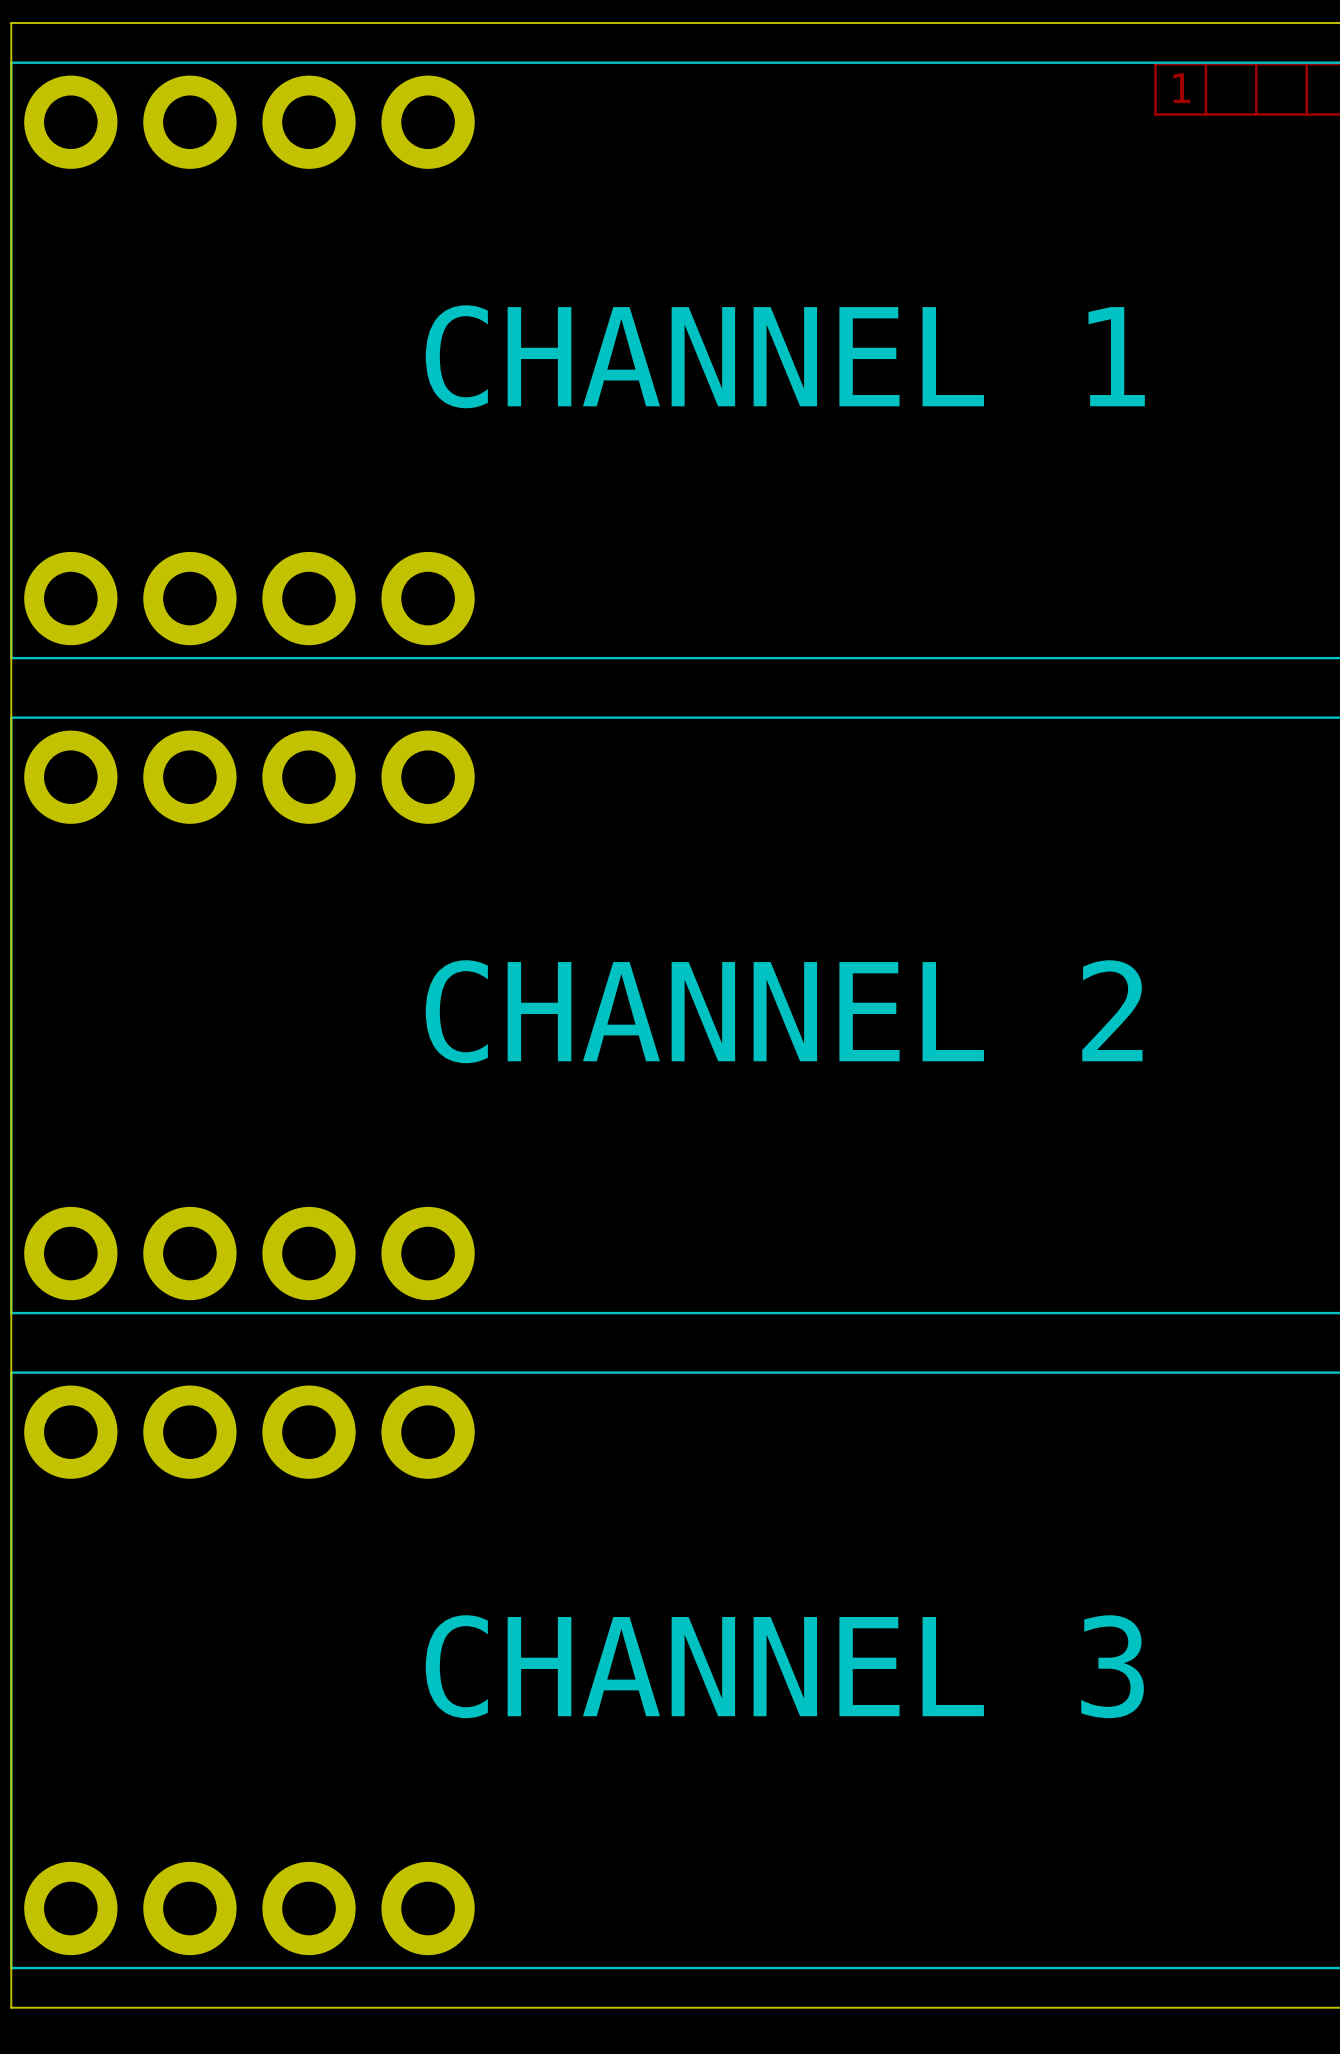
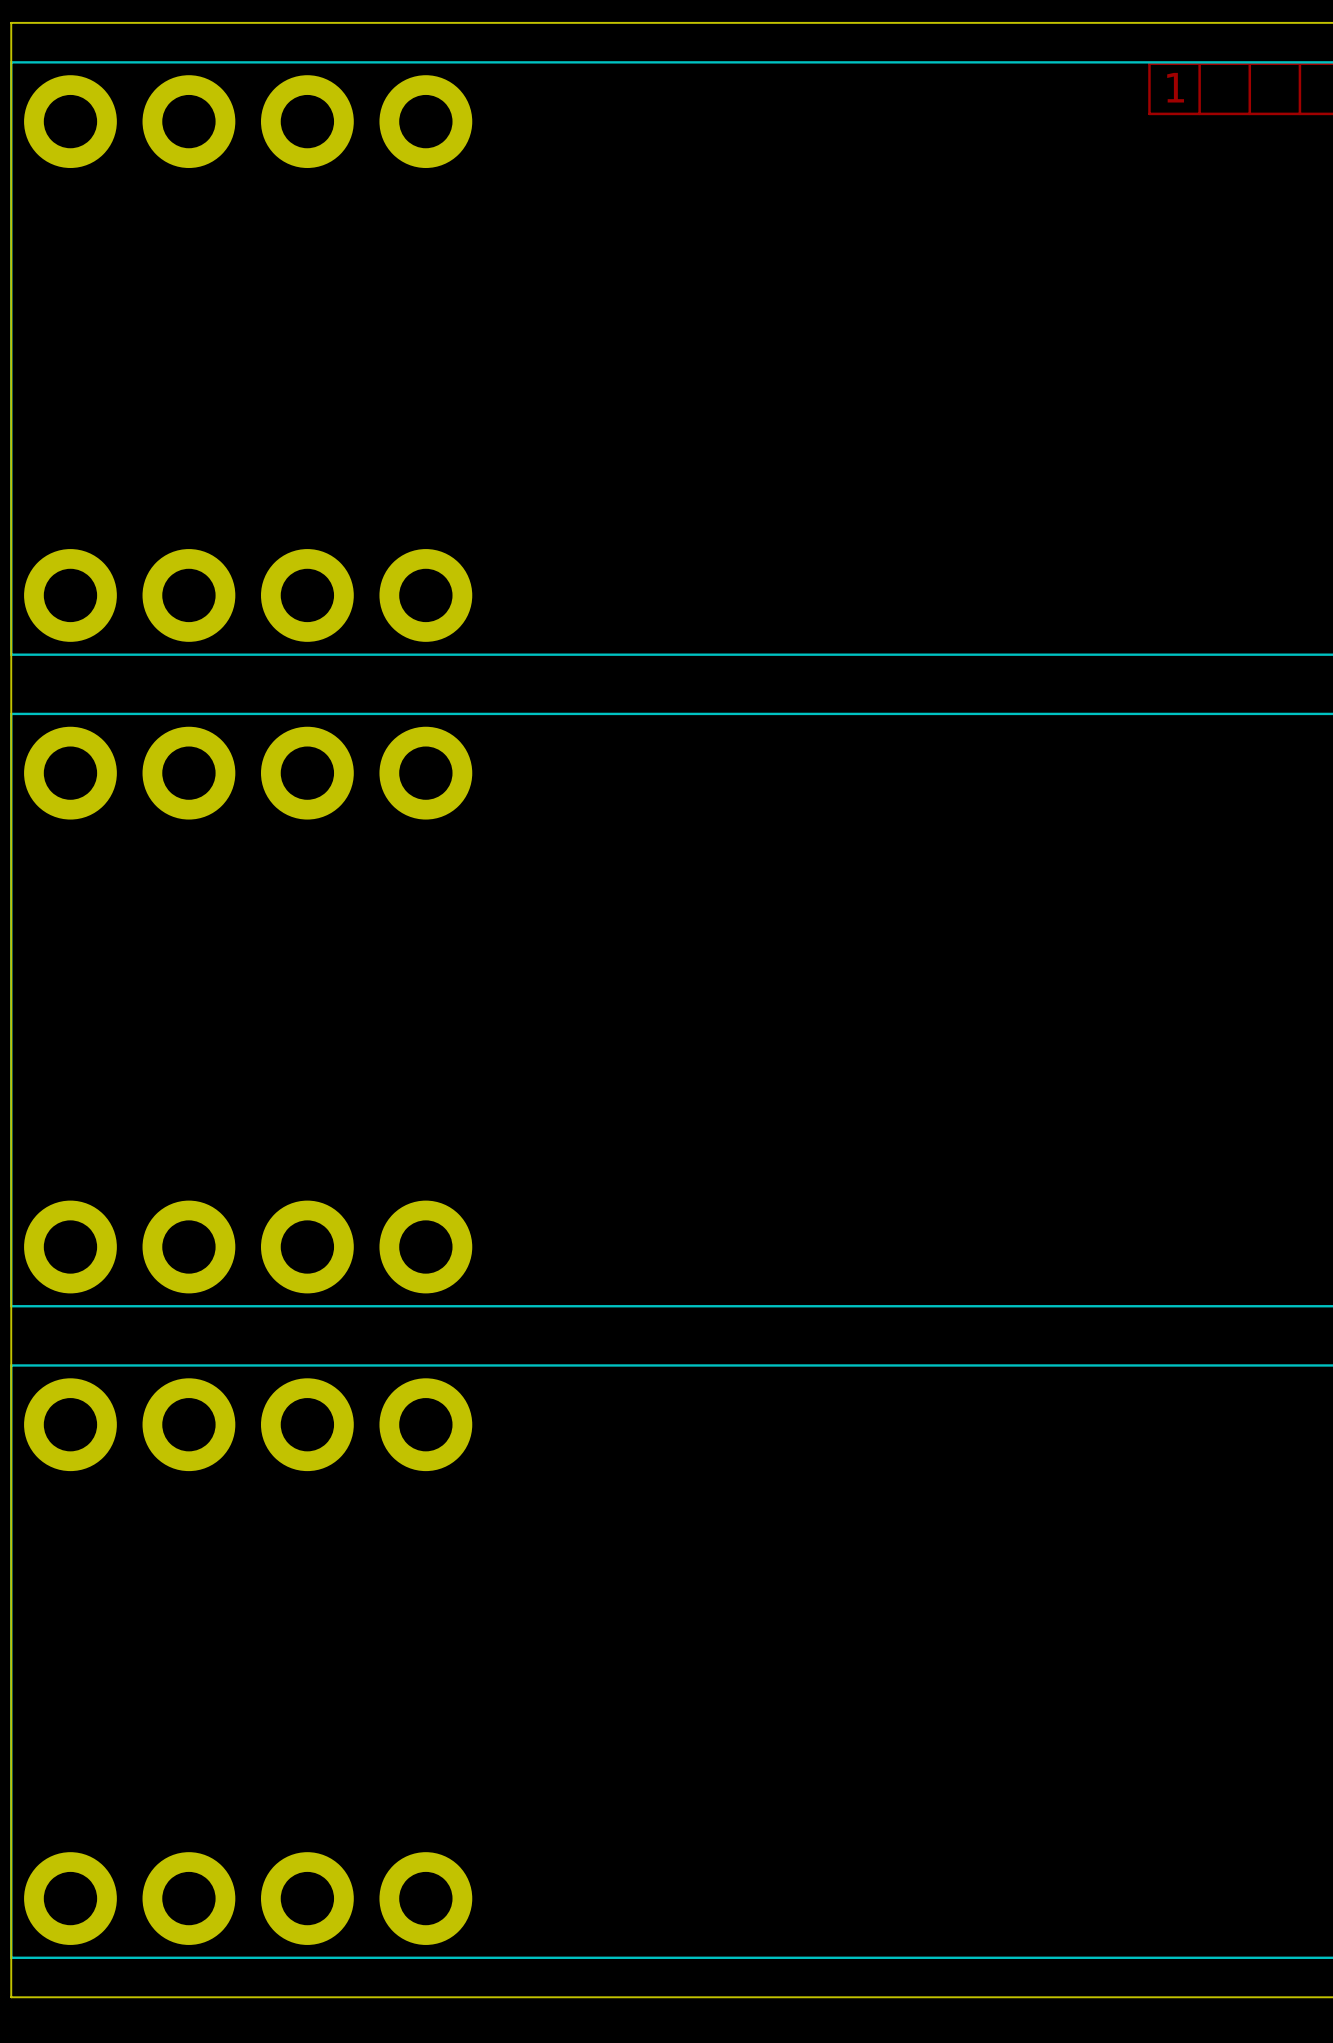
text: CHANNEL 1 (785, 356) -> none
text: CHANNEL 2 (784, 1011) -> none
text: CHANNEL 3 (784, 1666) -> none

